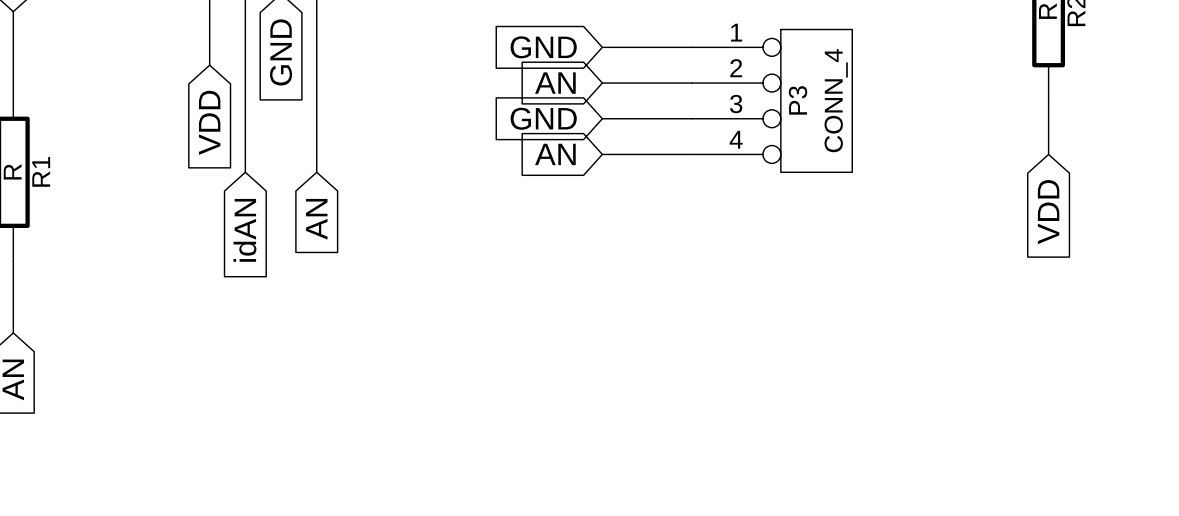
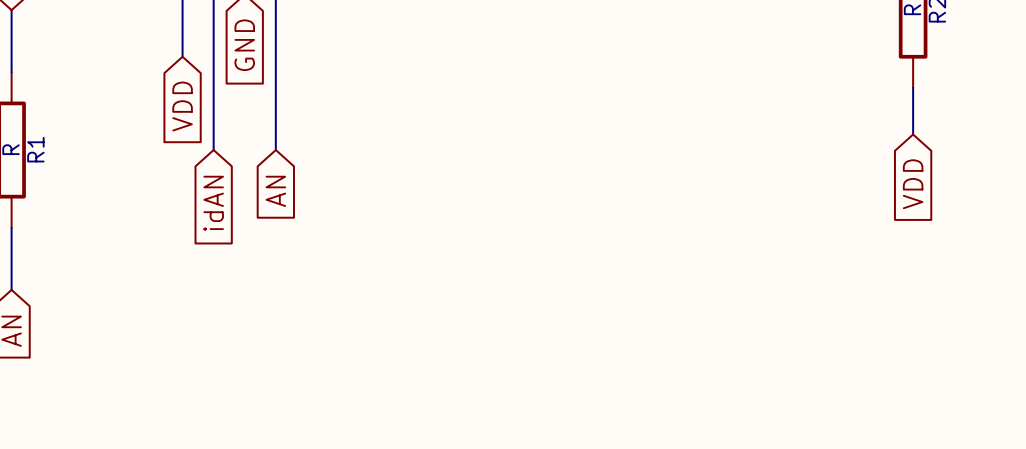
global label: GND (543, 47) -> none
wire: (602, 47) (691, 47) -> none
global label: AN (555, 83) -> none
wire: (602, 83) (691, 83) -> none
P3: CONN_4 (771, 100) -> none
global label: GND (543, 118) -> none
wire: (602, 118) (691, 118) -> none
global label: AN (555, 154) -> none
wire: (602, 154) (691, 154) -> none

